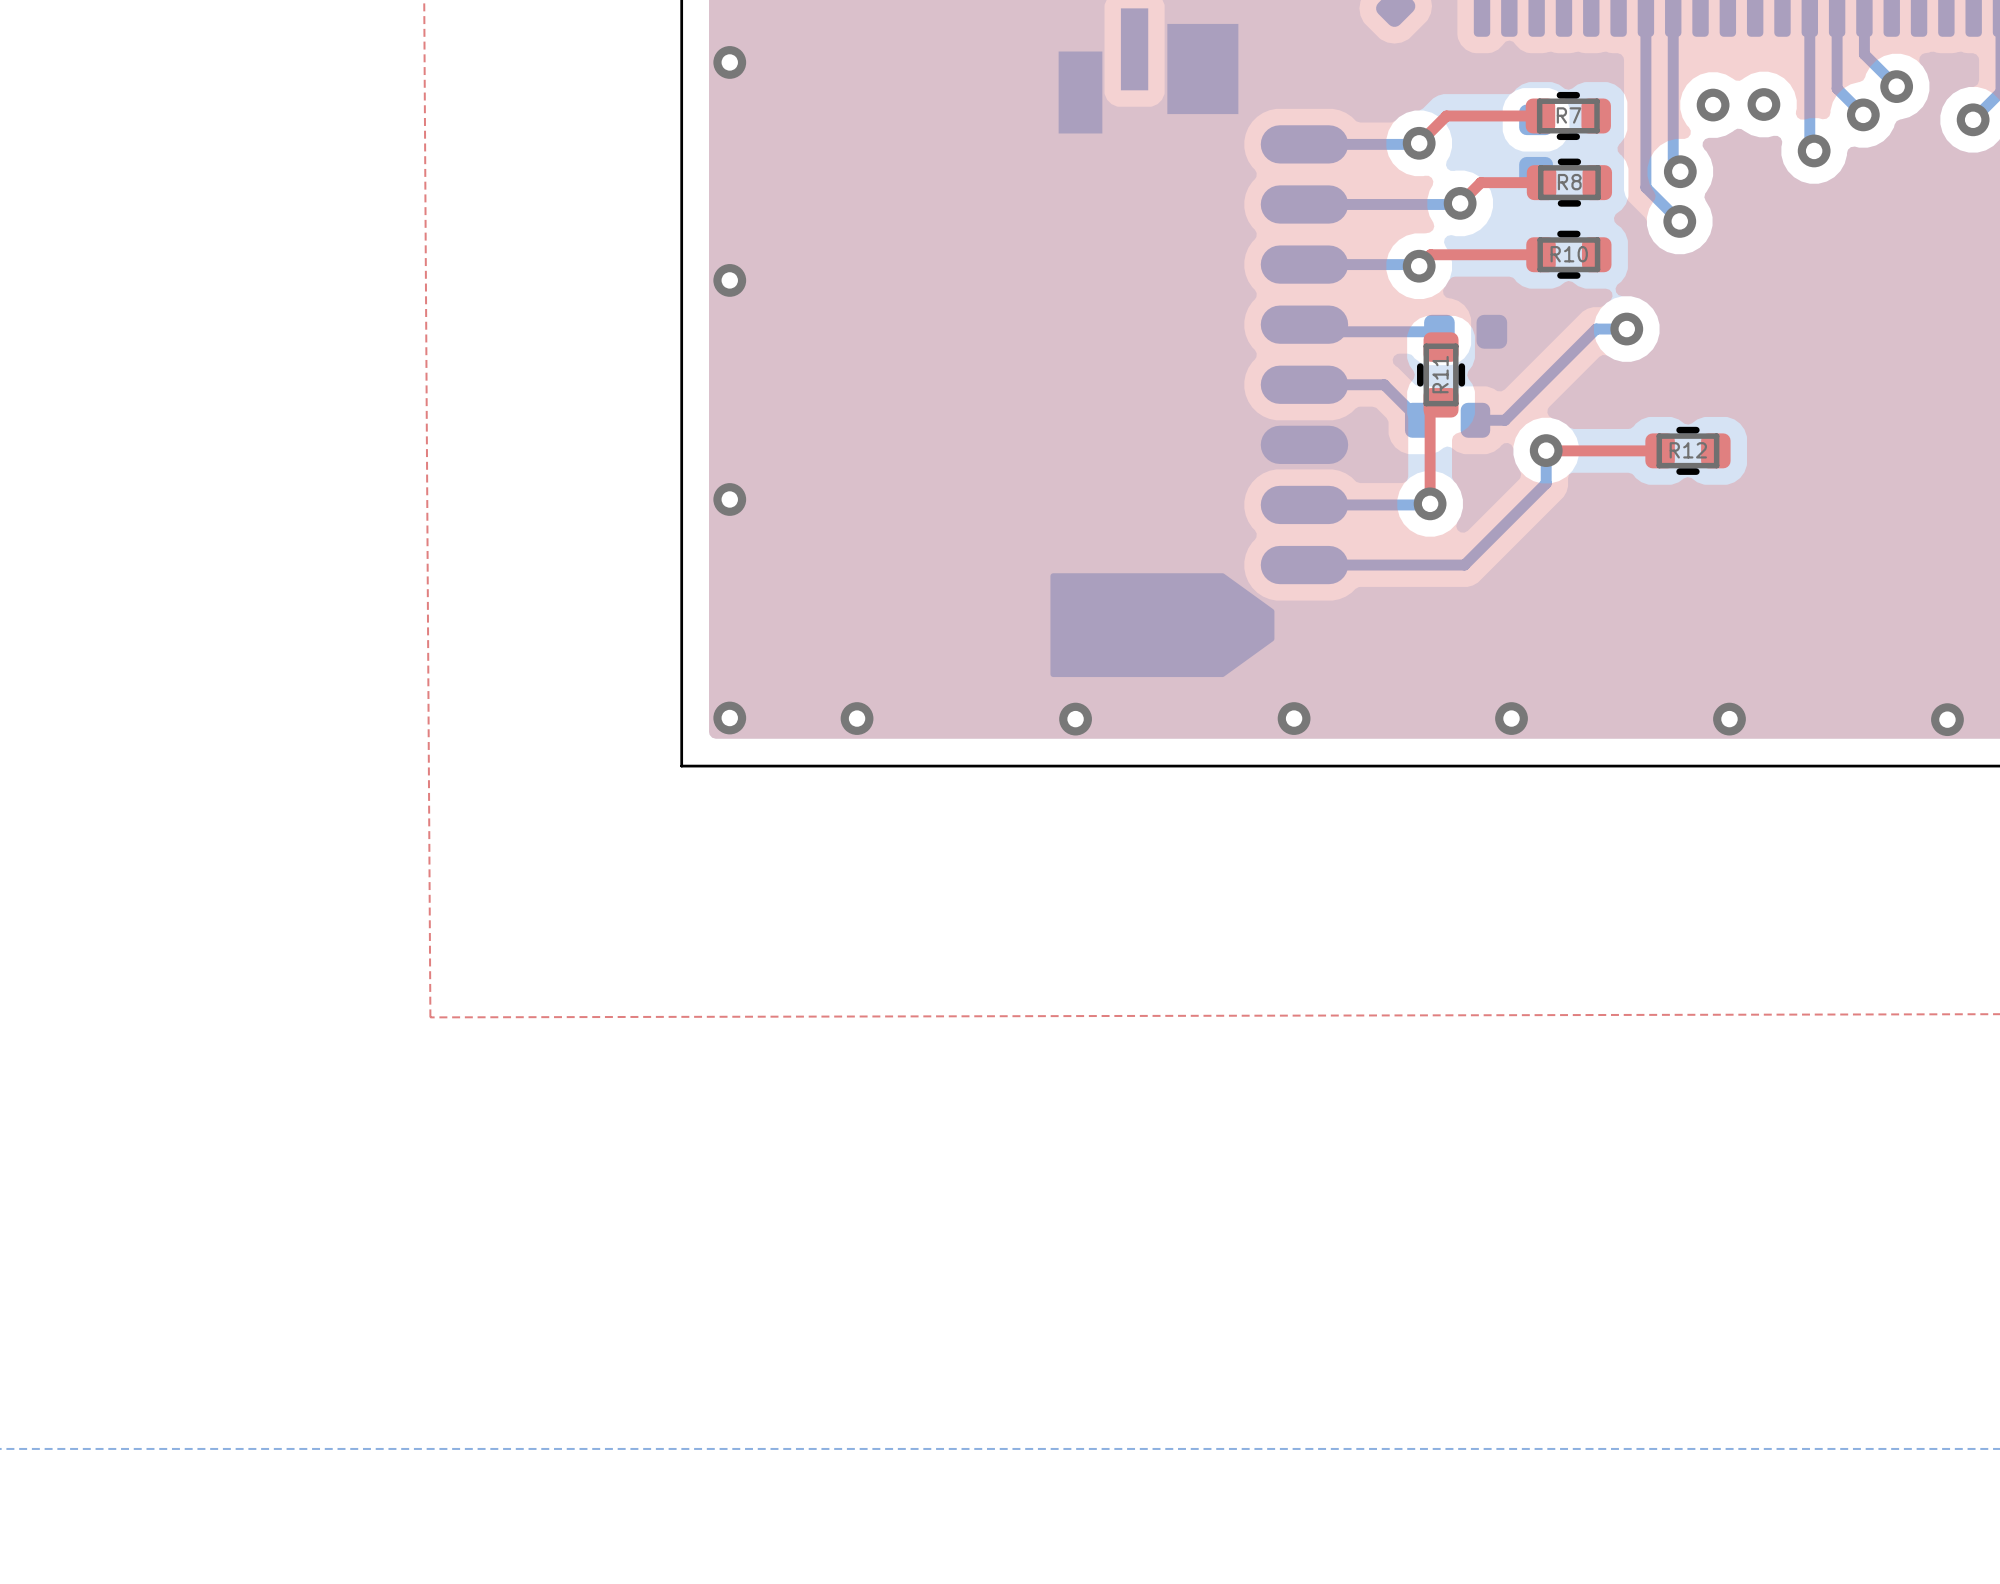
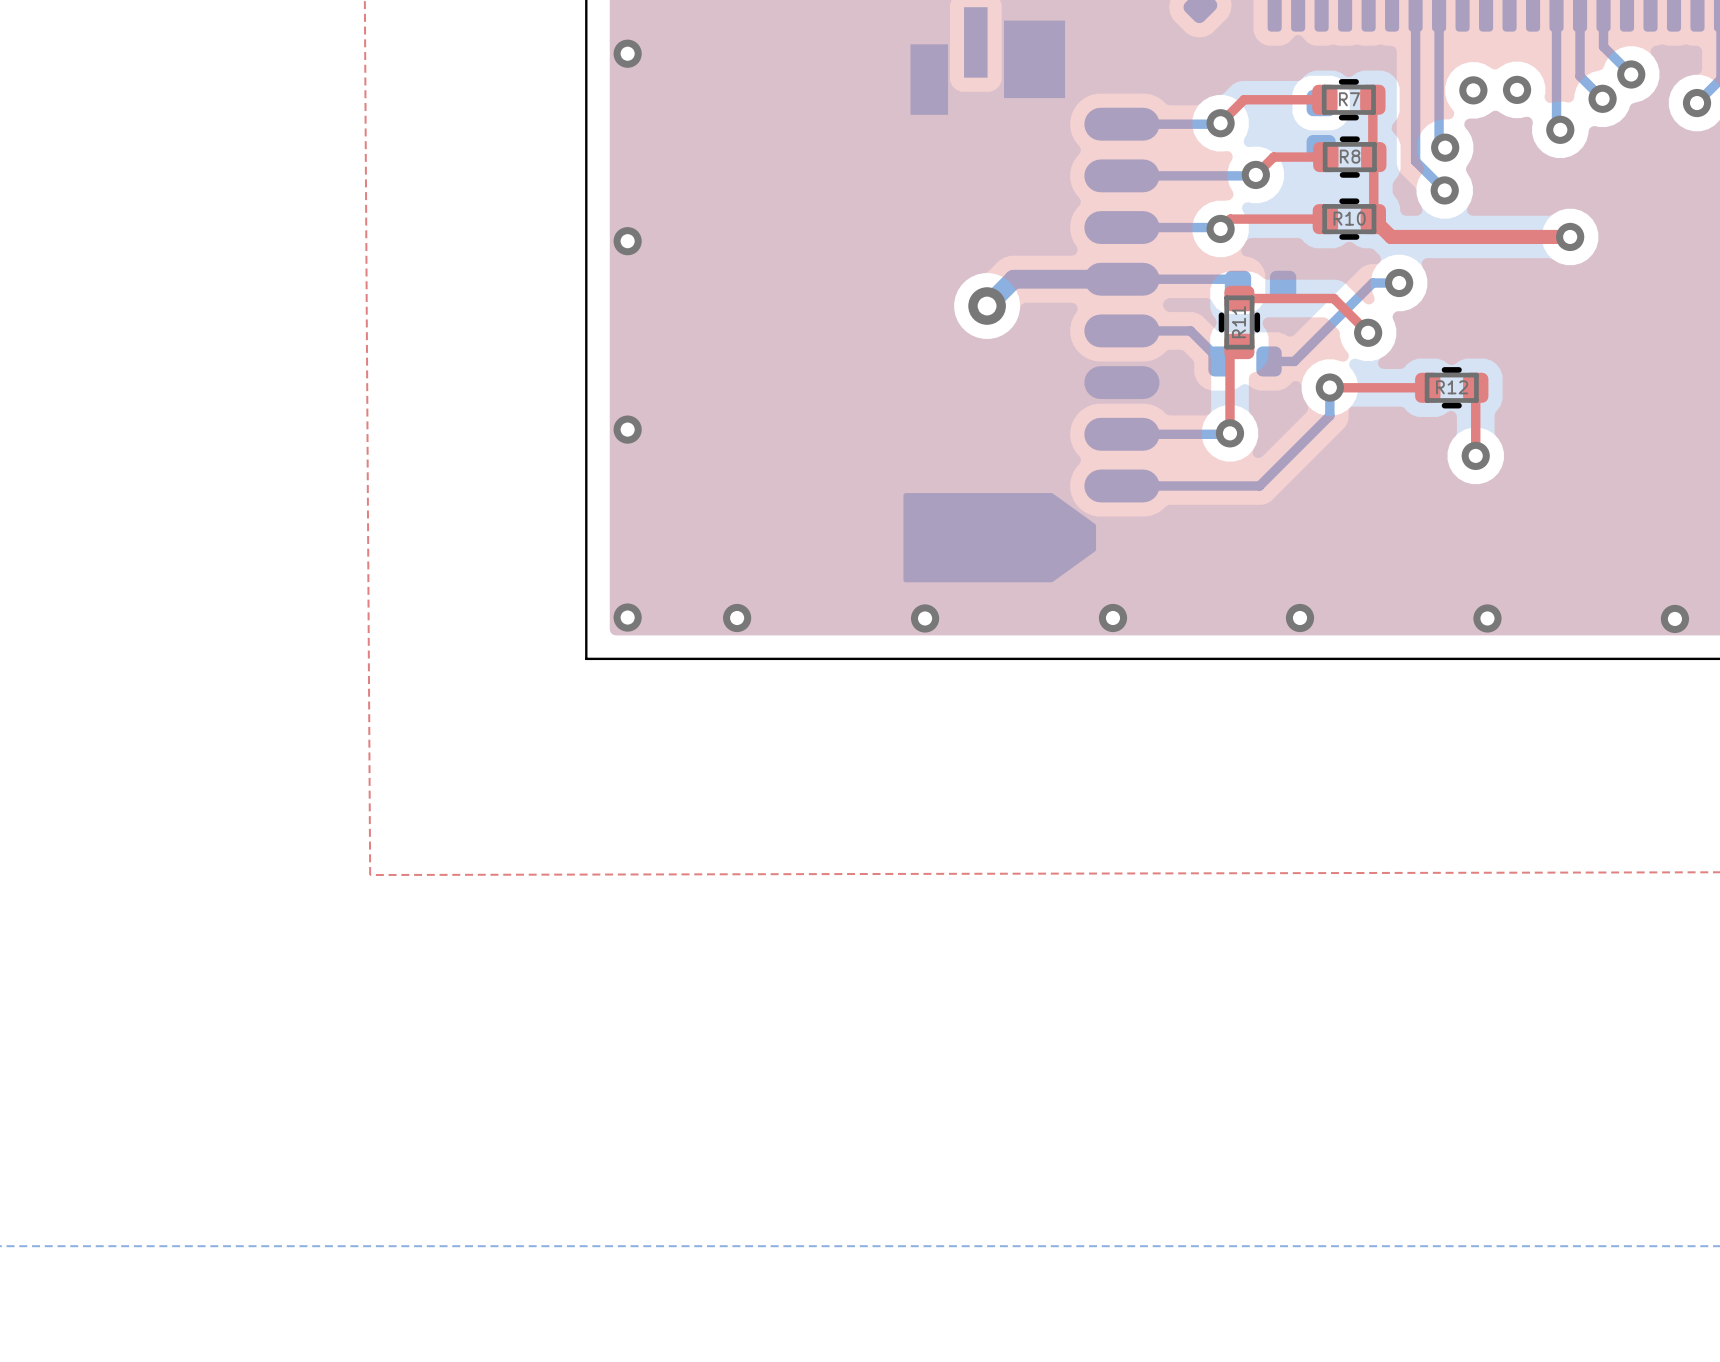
top track: none -> (1372, 99) (1373, 218)
top track: none -> (1373, 219) (1391, 236) (1570, 236)
via: none -> (1570, 236)
bottom track: (1304, 324) (1311, 331) (1439, 331) -> (987, 306) (1013, 279) (1231, 279) (1237, 285)
top track: none -> (1239, 298) (1333, 298) (1368, 332)
via: none -> (987, 306)
via: none -> (1368, 332)
top track: none -> (1475, 387) (1475, 455)
via: none -> (1475, 455)

